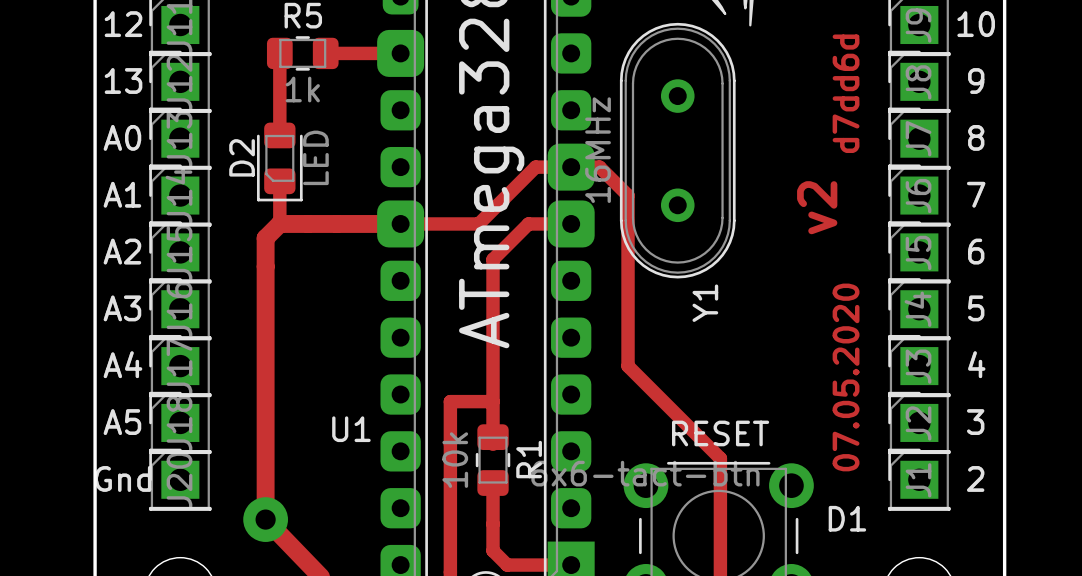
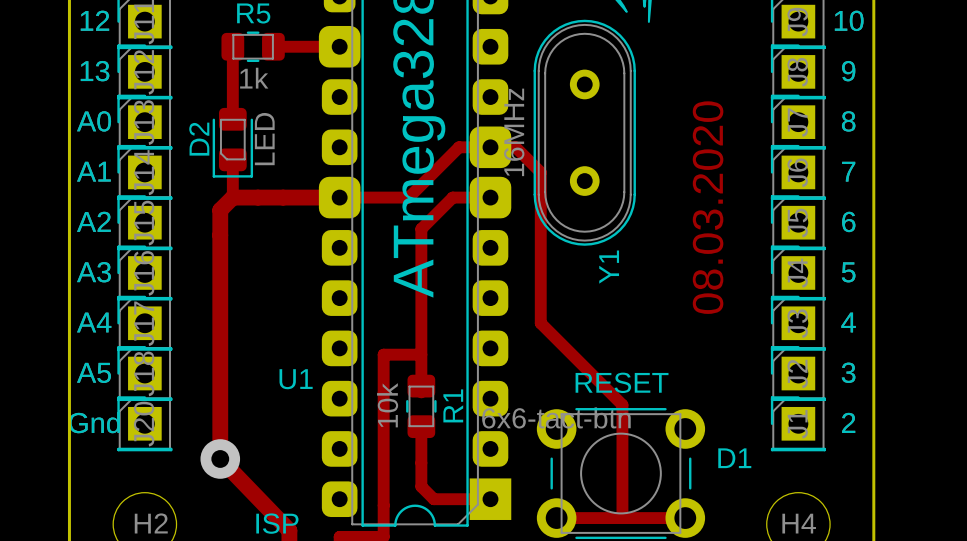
text: d7dd6d (846, 93) -> none
text: v2 (817, 207) -> none
text: 07.05.2020 (846, 377) -> 08.03.2020 (708, 207)

